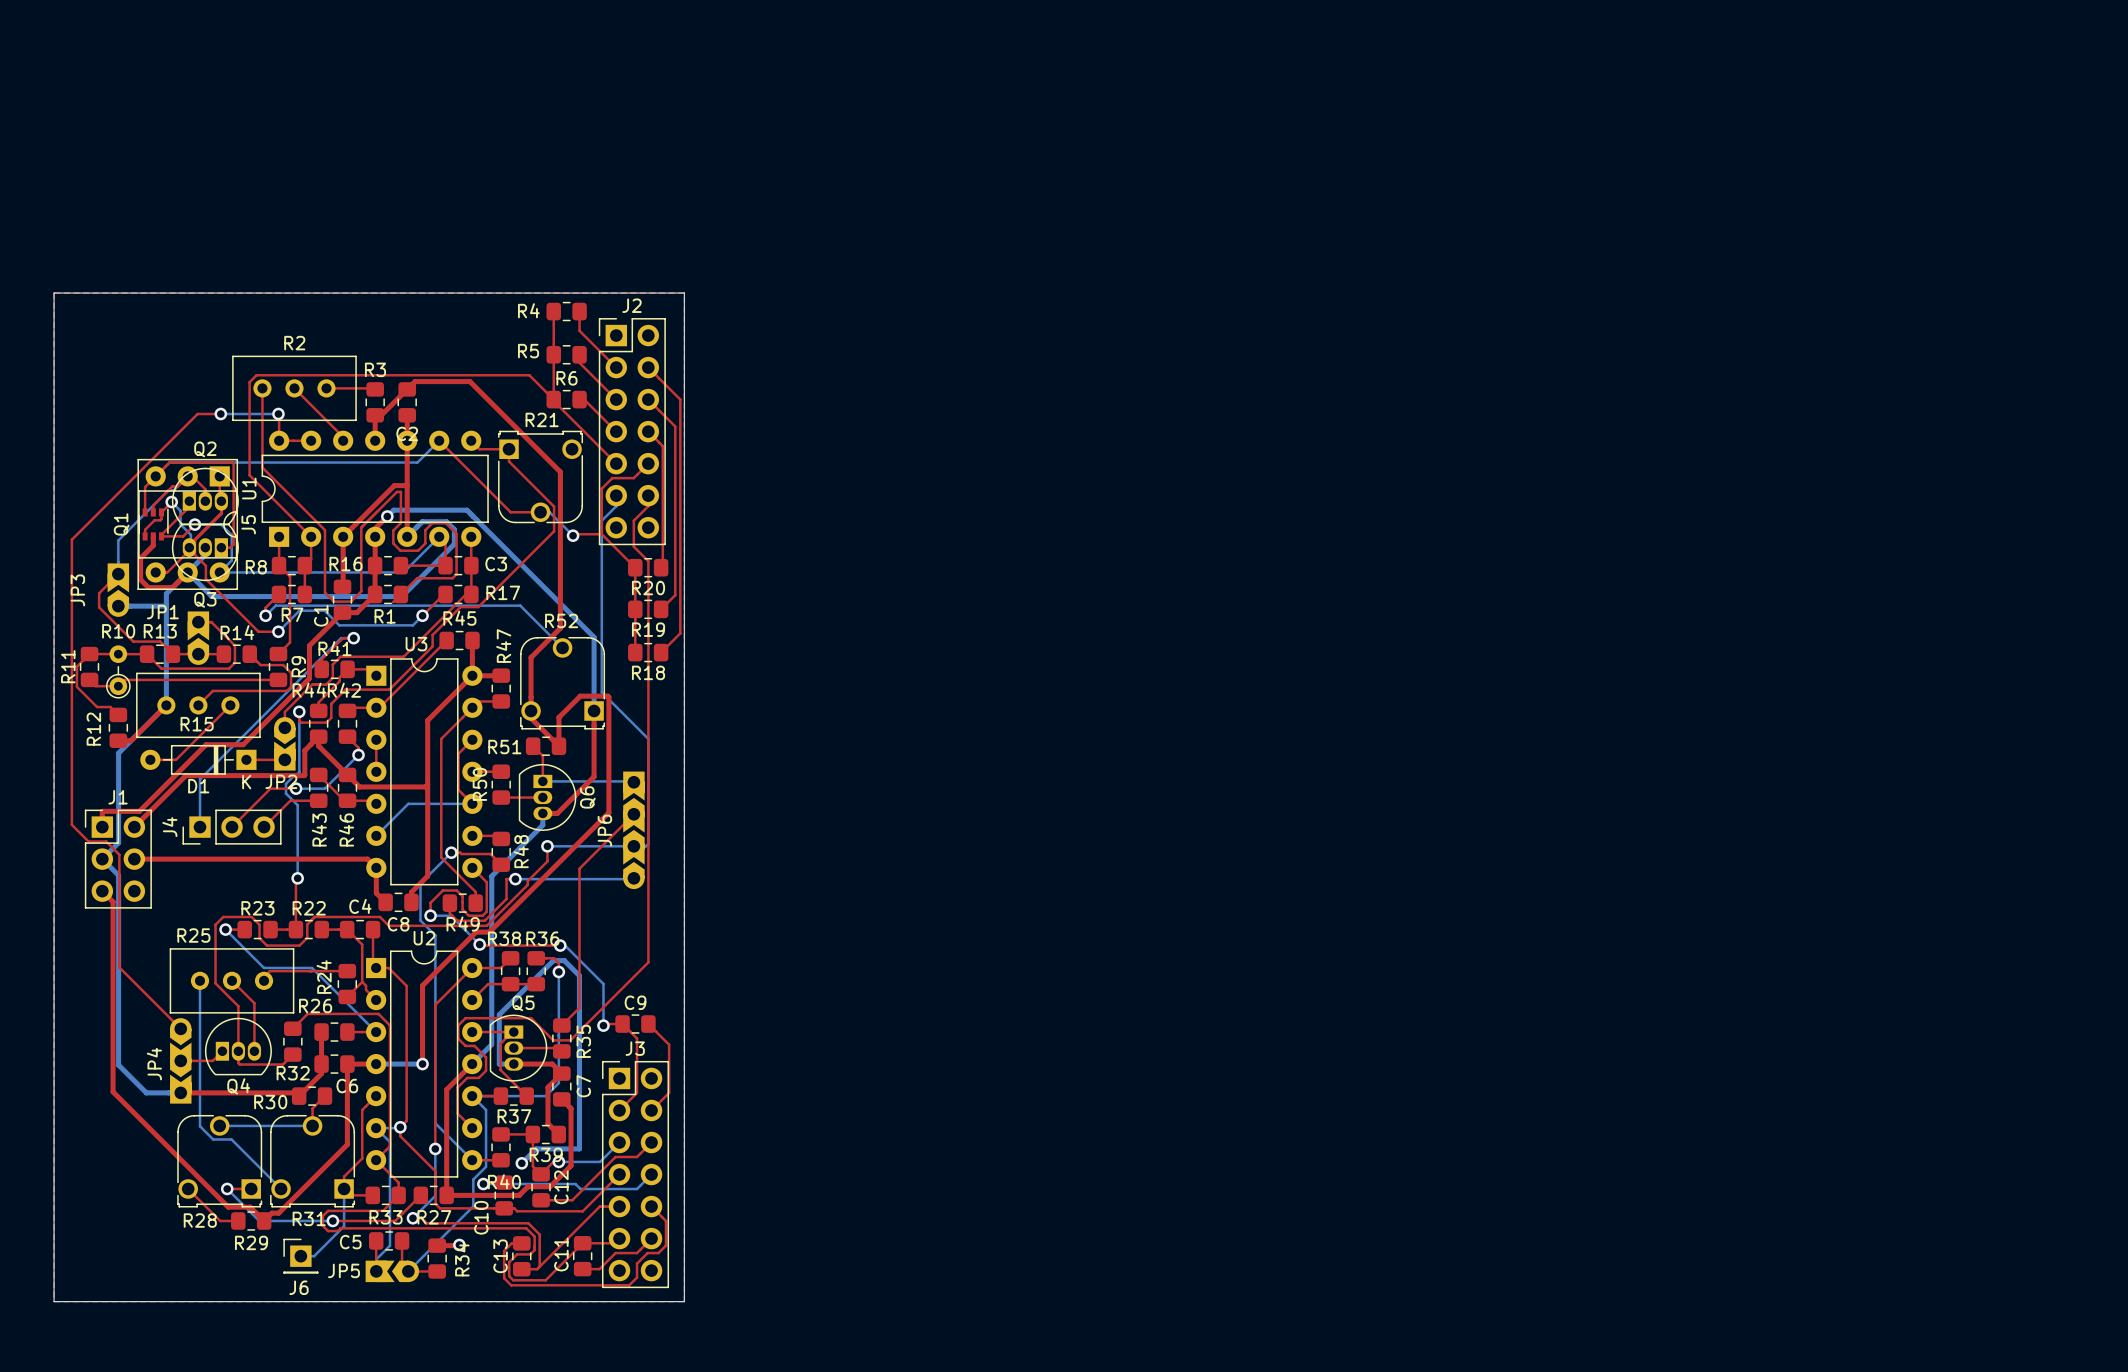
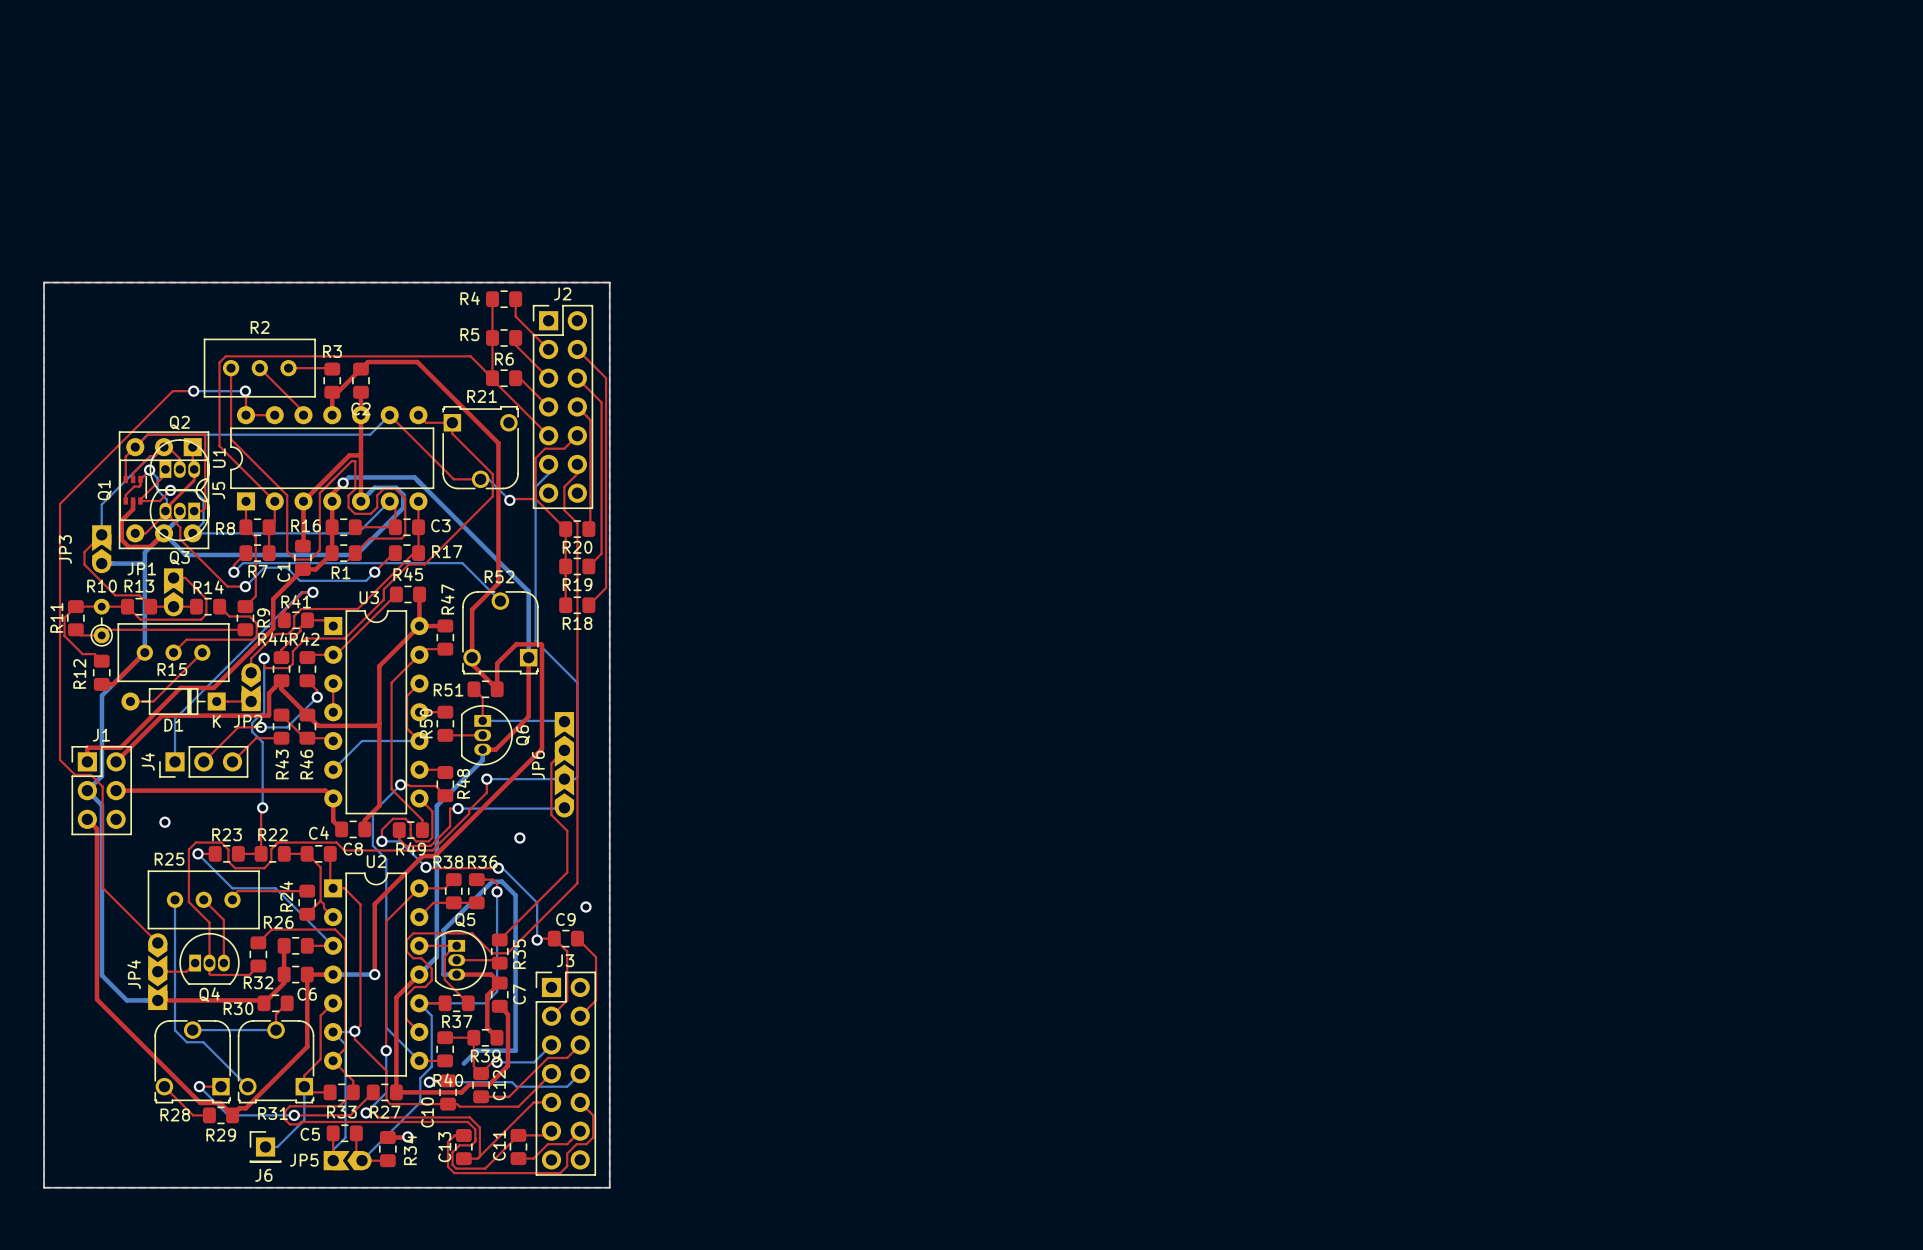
top track: (619, 828) (579, 868) (579, 1007) -> (551, 763) (551, 814) (567, 830) (567, 872) (515, 924)
via: none -> (164, 822)
via: none -> (519, 838)
via: none -> (585, 907)
via: (521, 1163) -> none

